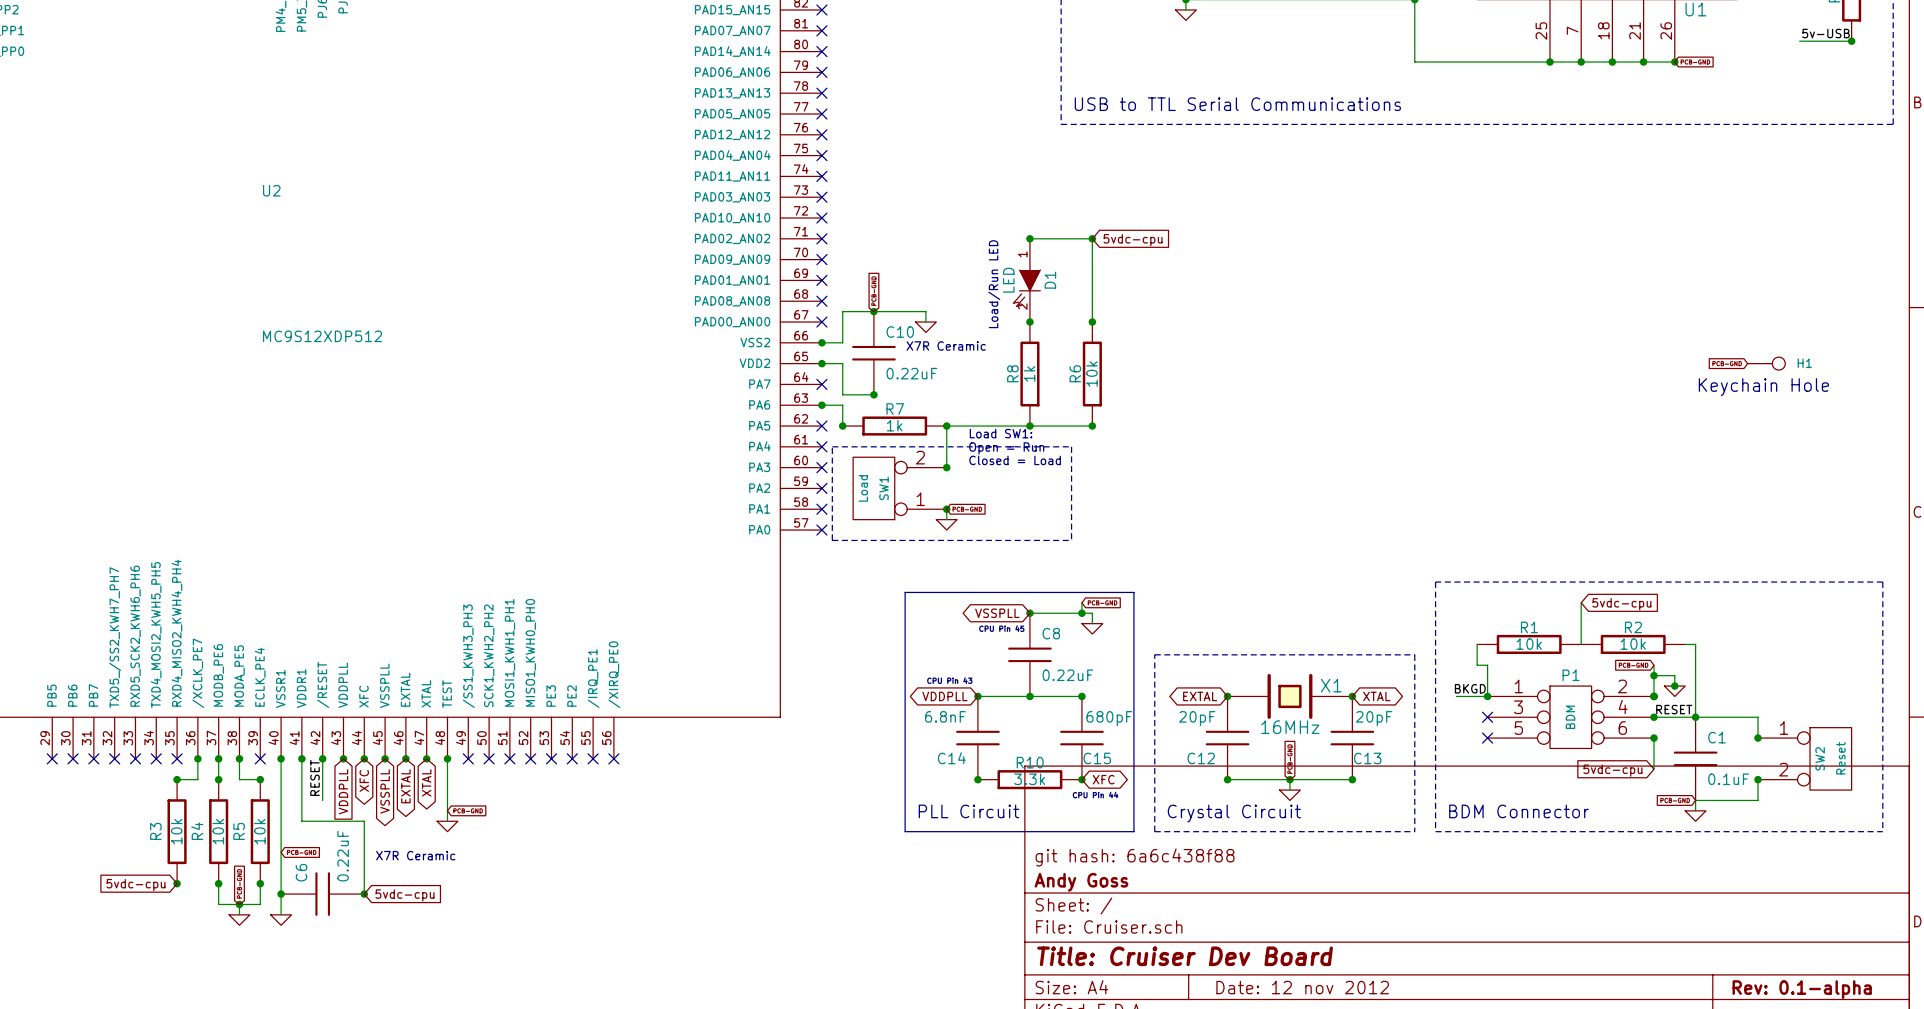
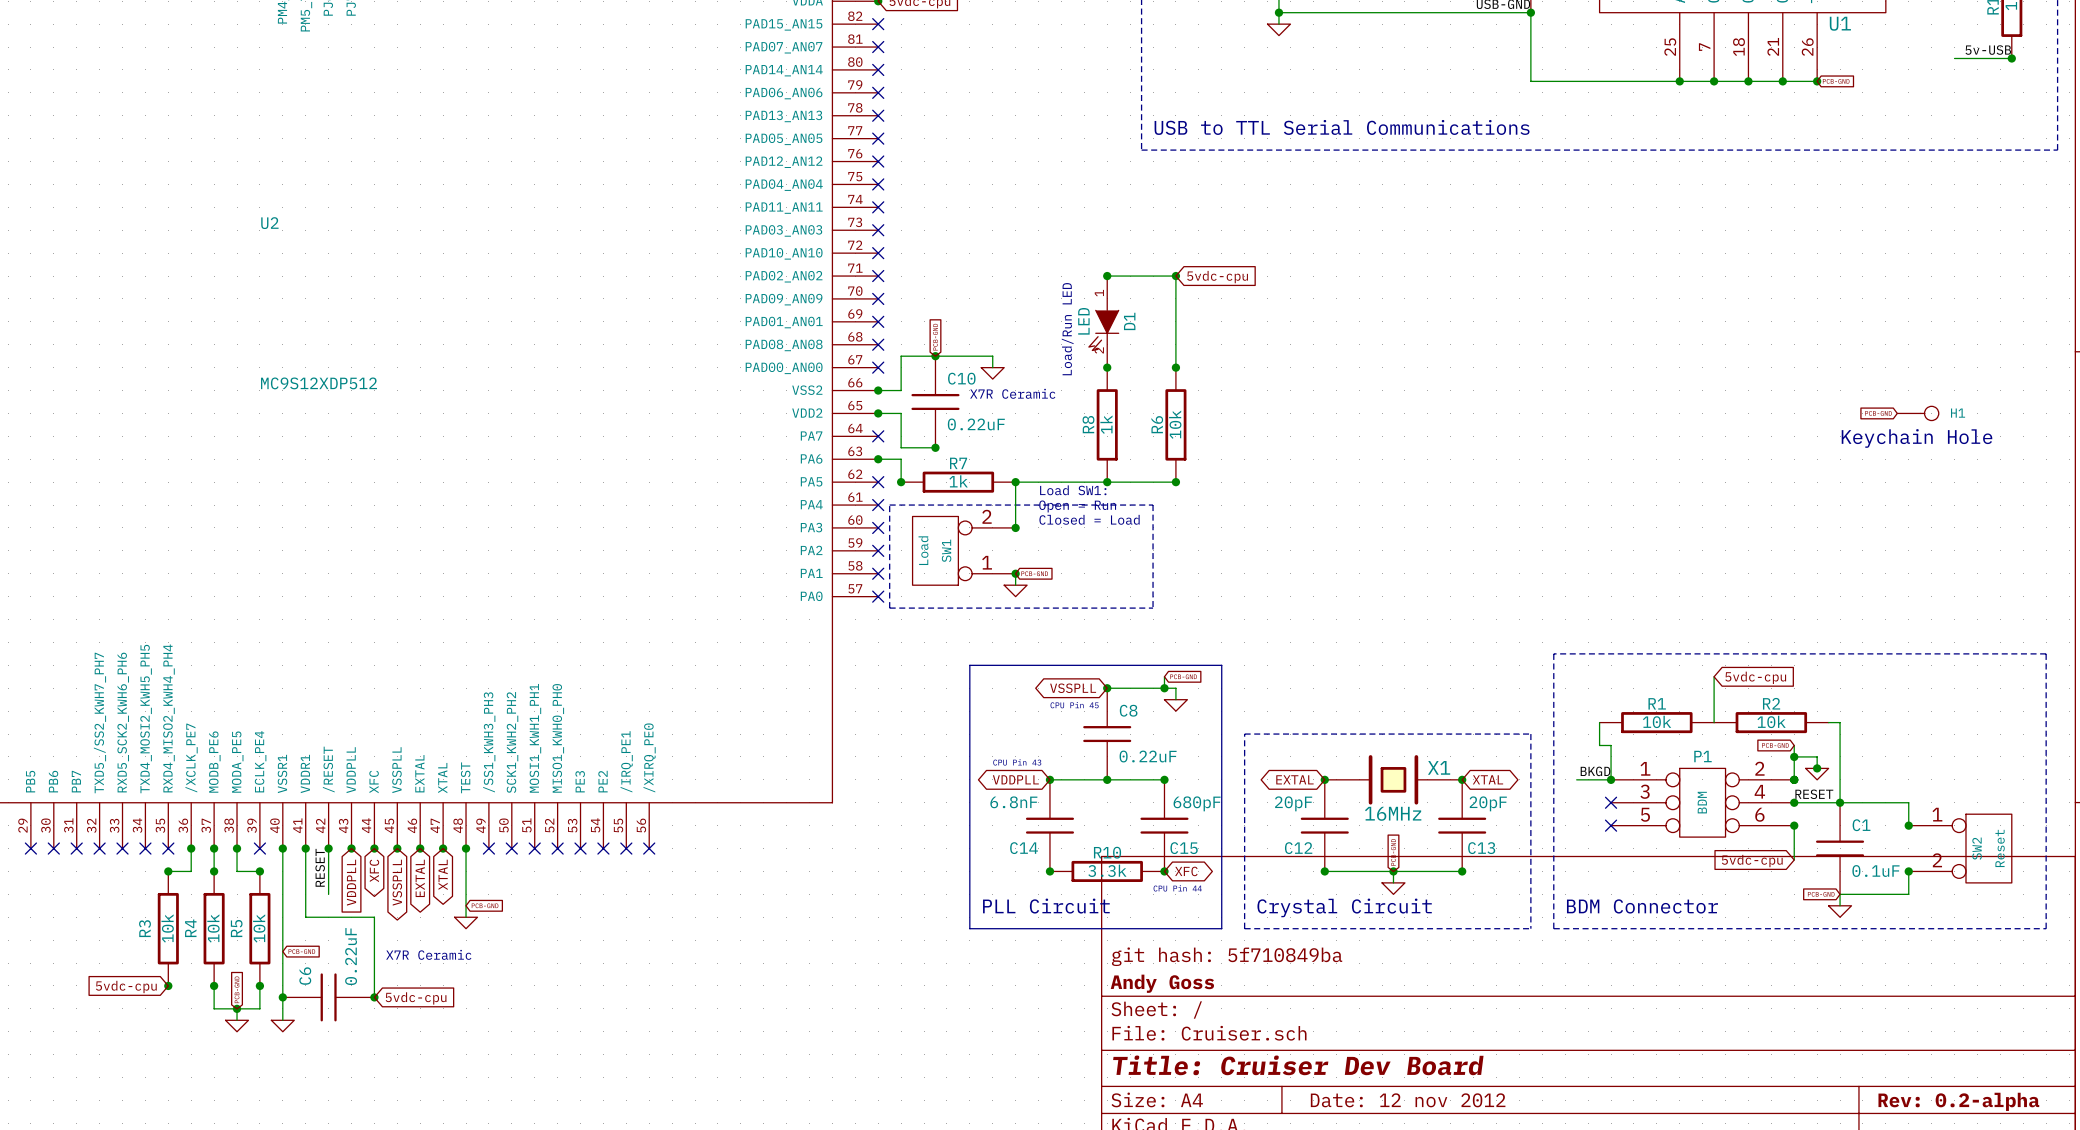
title block: git hash: 6a6c438f88 (1135, 857) -> git hash: 5f710849ba (1227, 956)
title block: Rev: 0.1-alpha (1802, 989) -> Rev: 0.2-alpha (1958, 1101)

